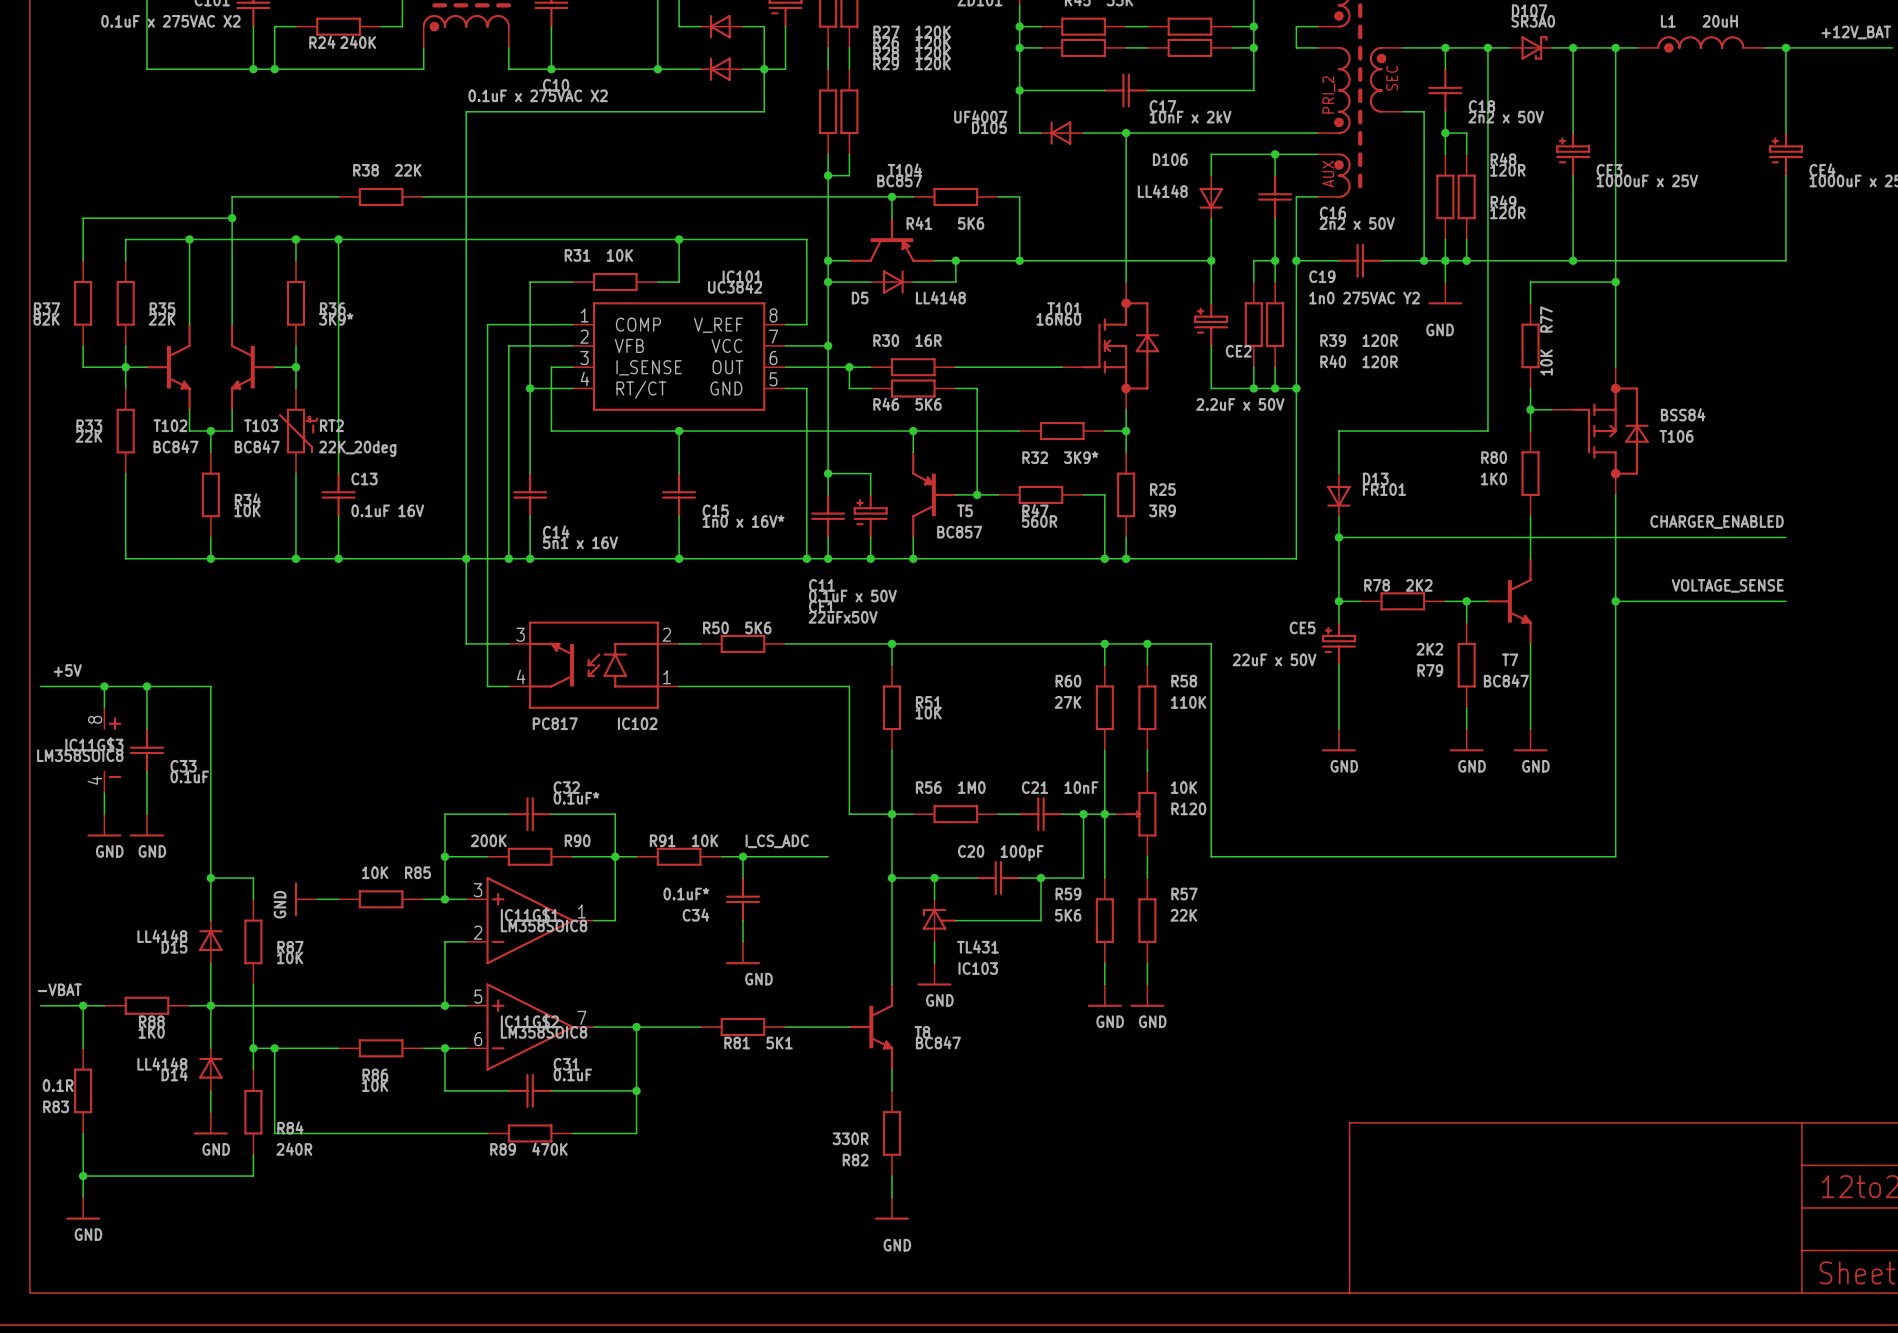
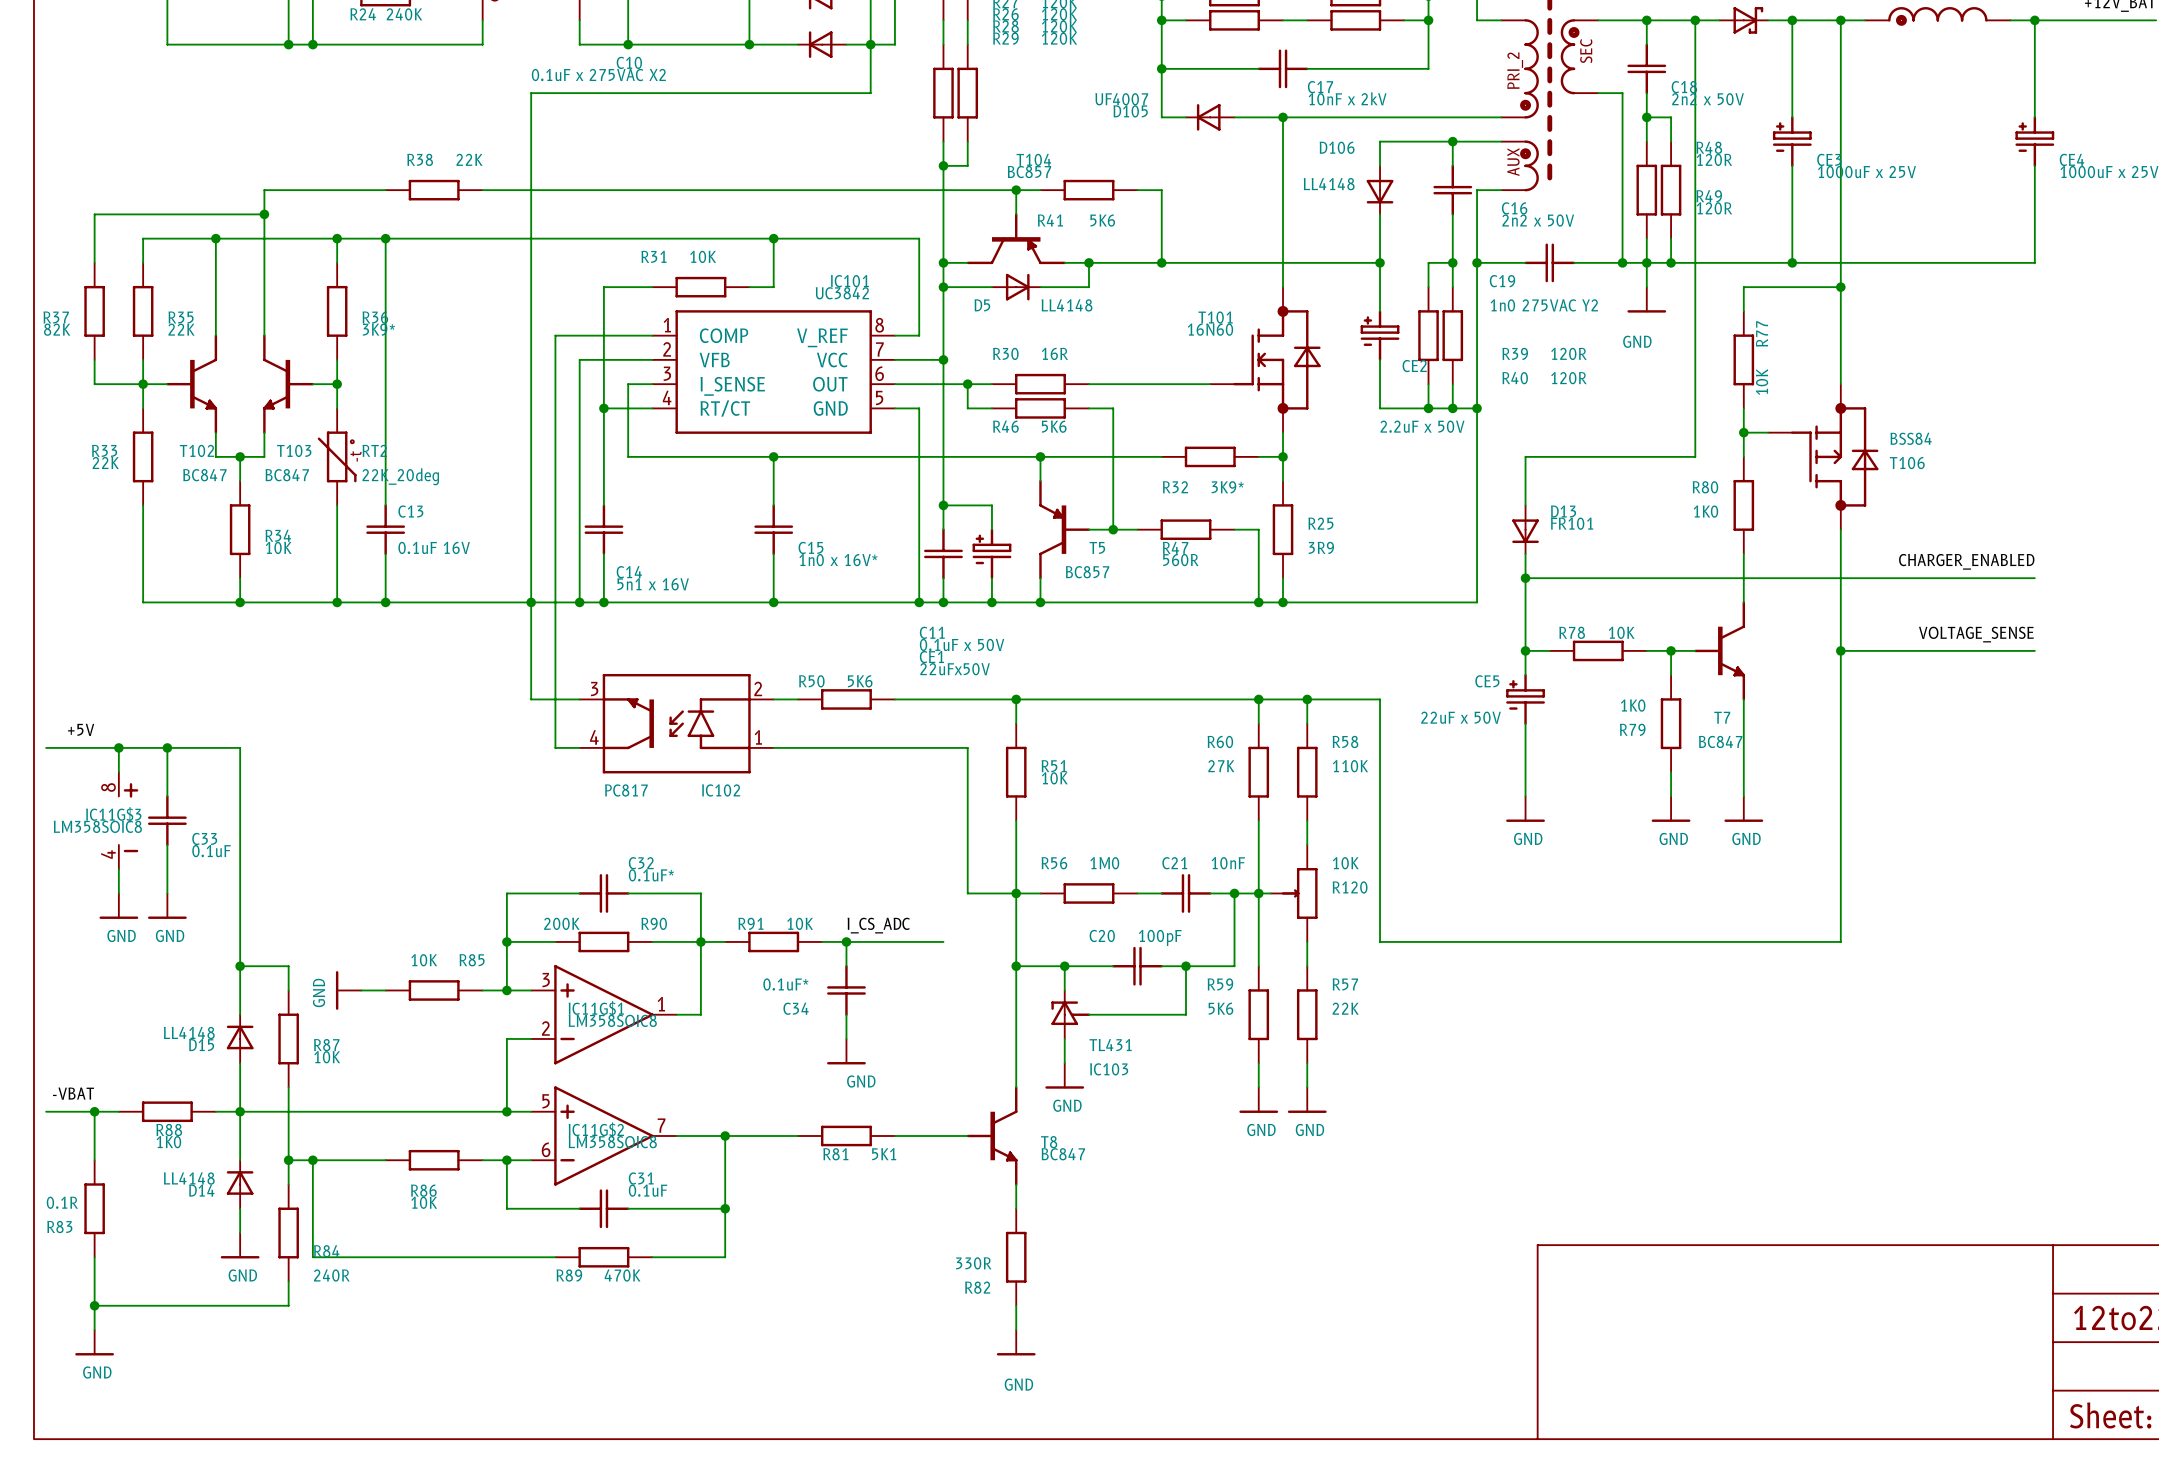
R78 value: 2K2 (1419, 585) -> 10K (1621, 632)
R79 value: 2K2 (1429, 649) -> 1K0 (1633, 705)

